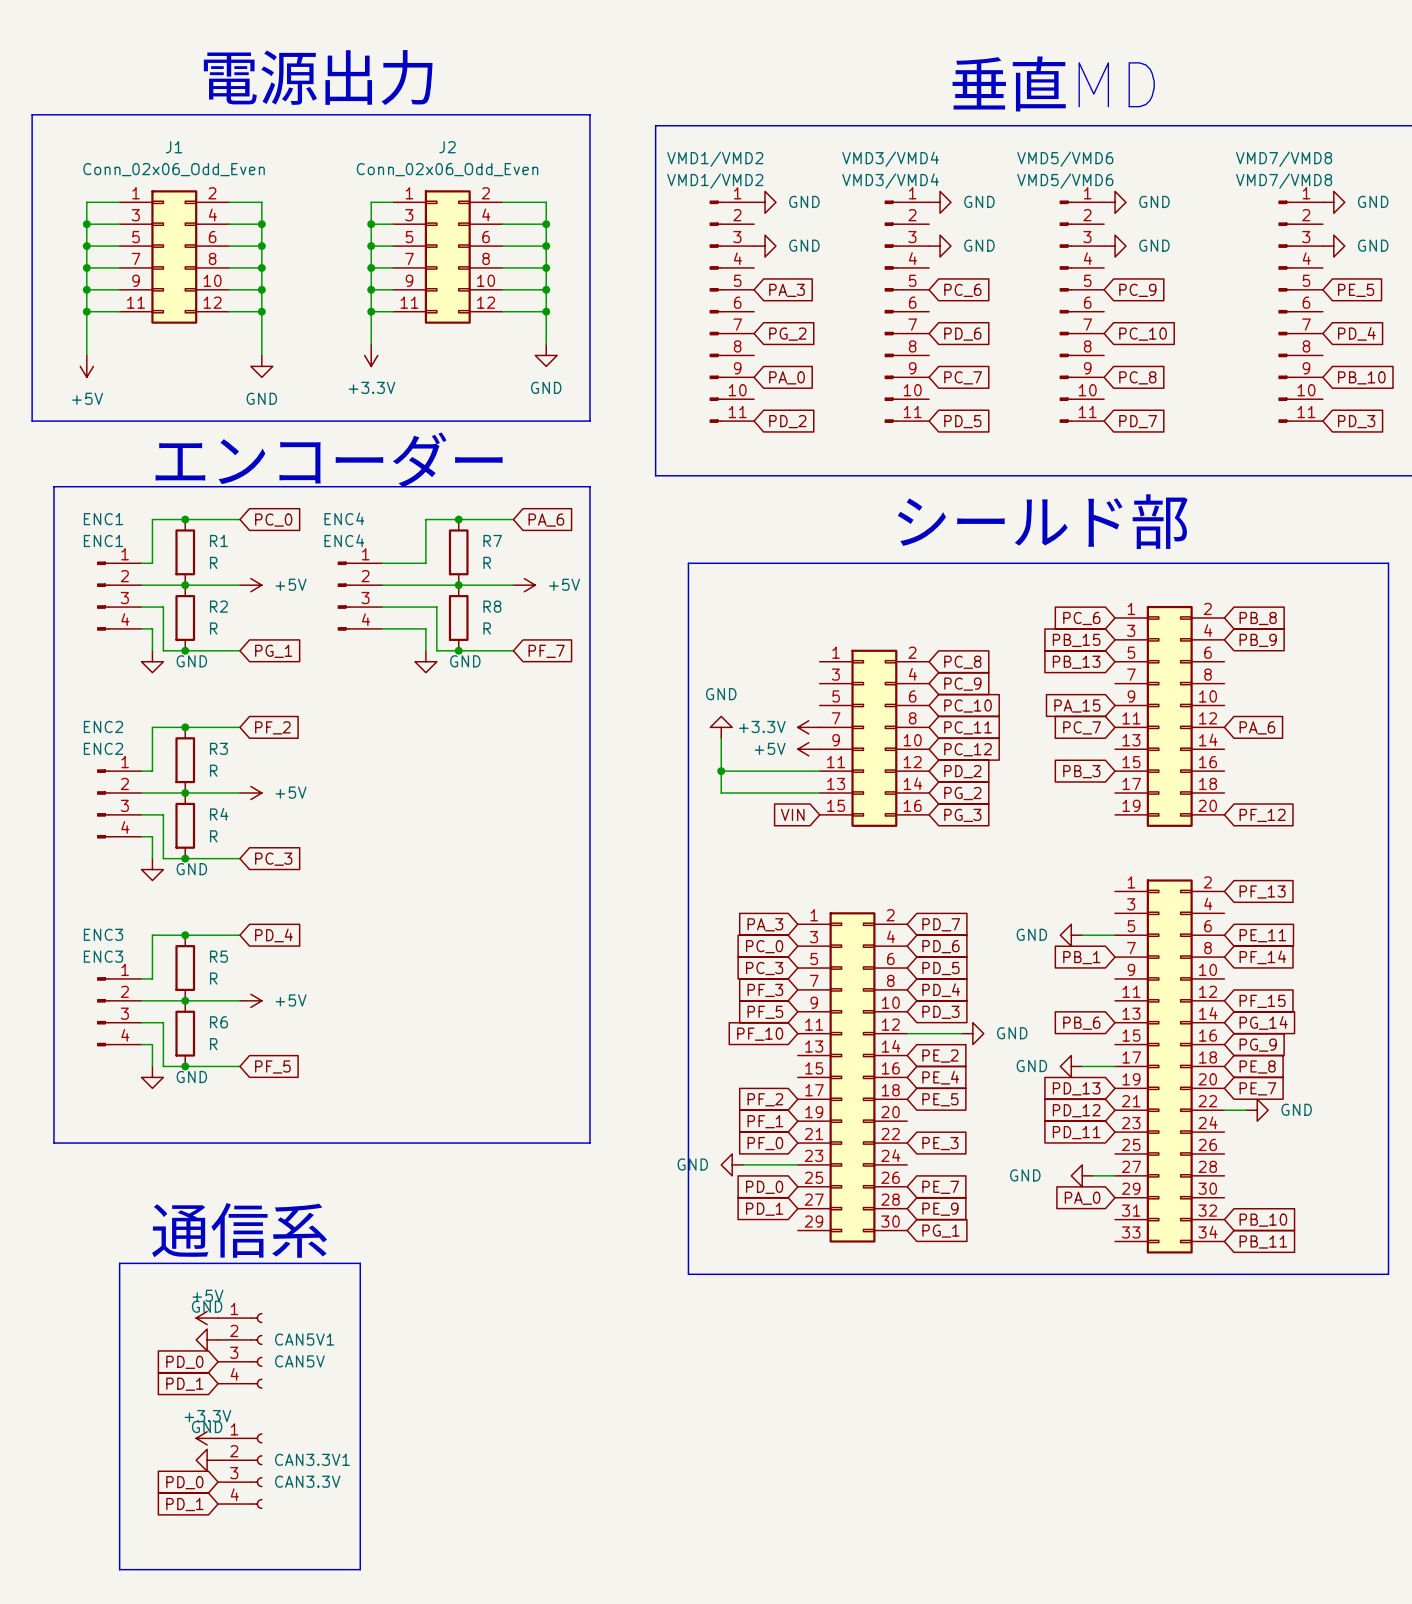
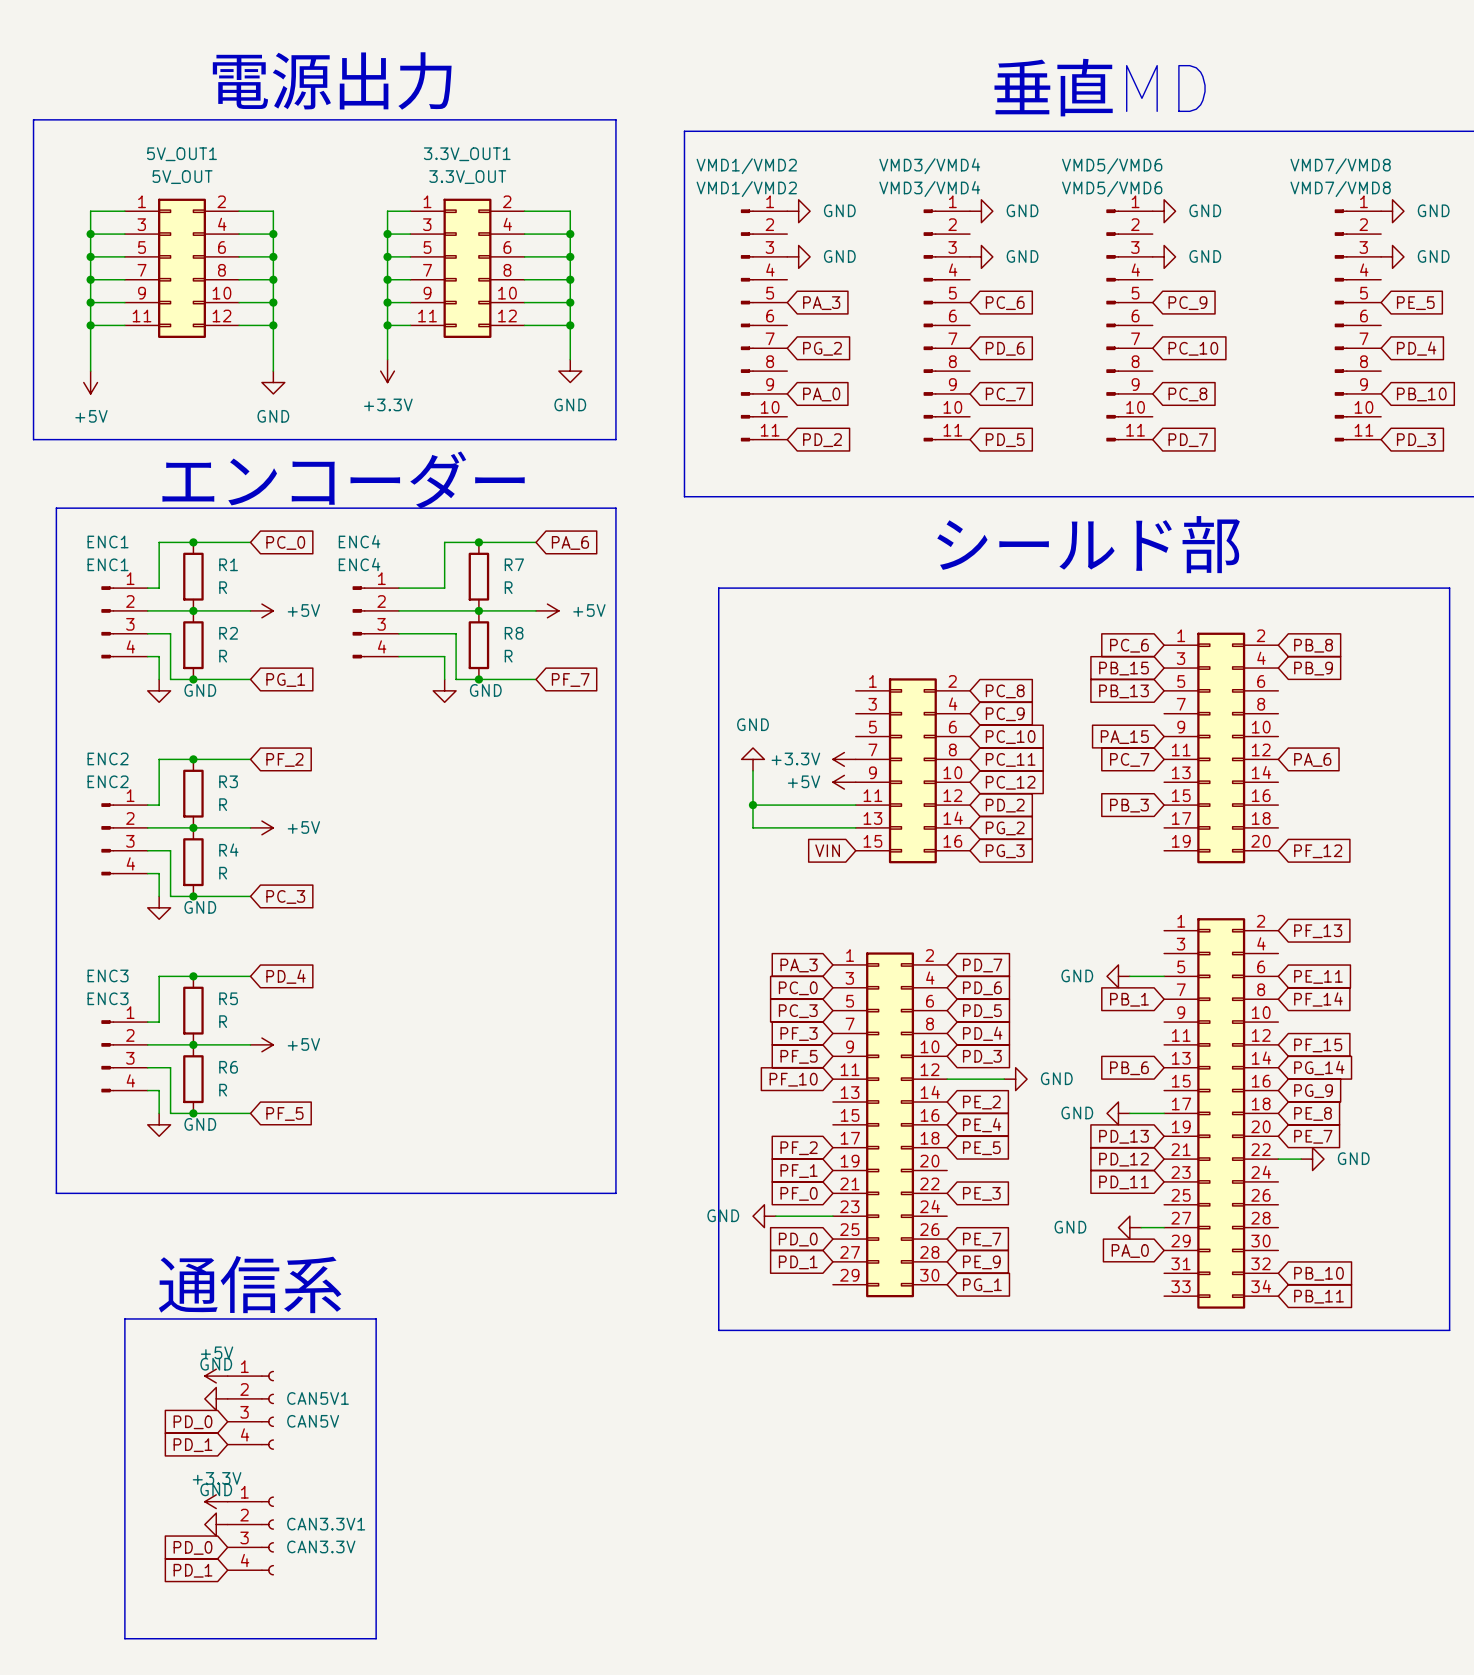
J1 name: J1 (174, 147) -> 5V_OUT1 (181, 154)
J2 name: J2 (447, 147) -> 3.3V_OUT1 (467, 154)
J1 value: Conn_02x06_Odd_Even (174, 169) -> 5V_OUT (182, 177)
J2 value: Conn_02x06_Odd_Even (447, 169) -> 3.3V_OUT (467, 177)

